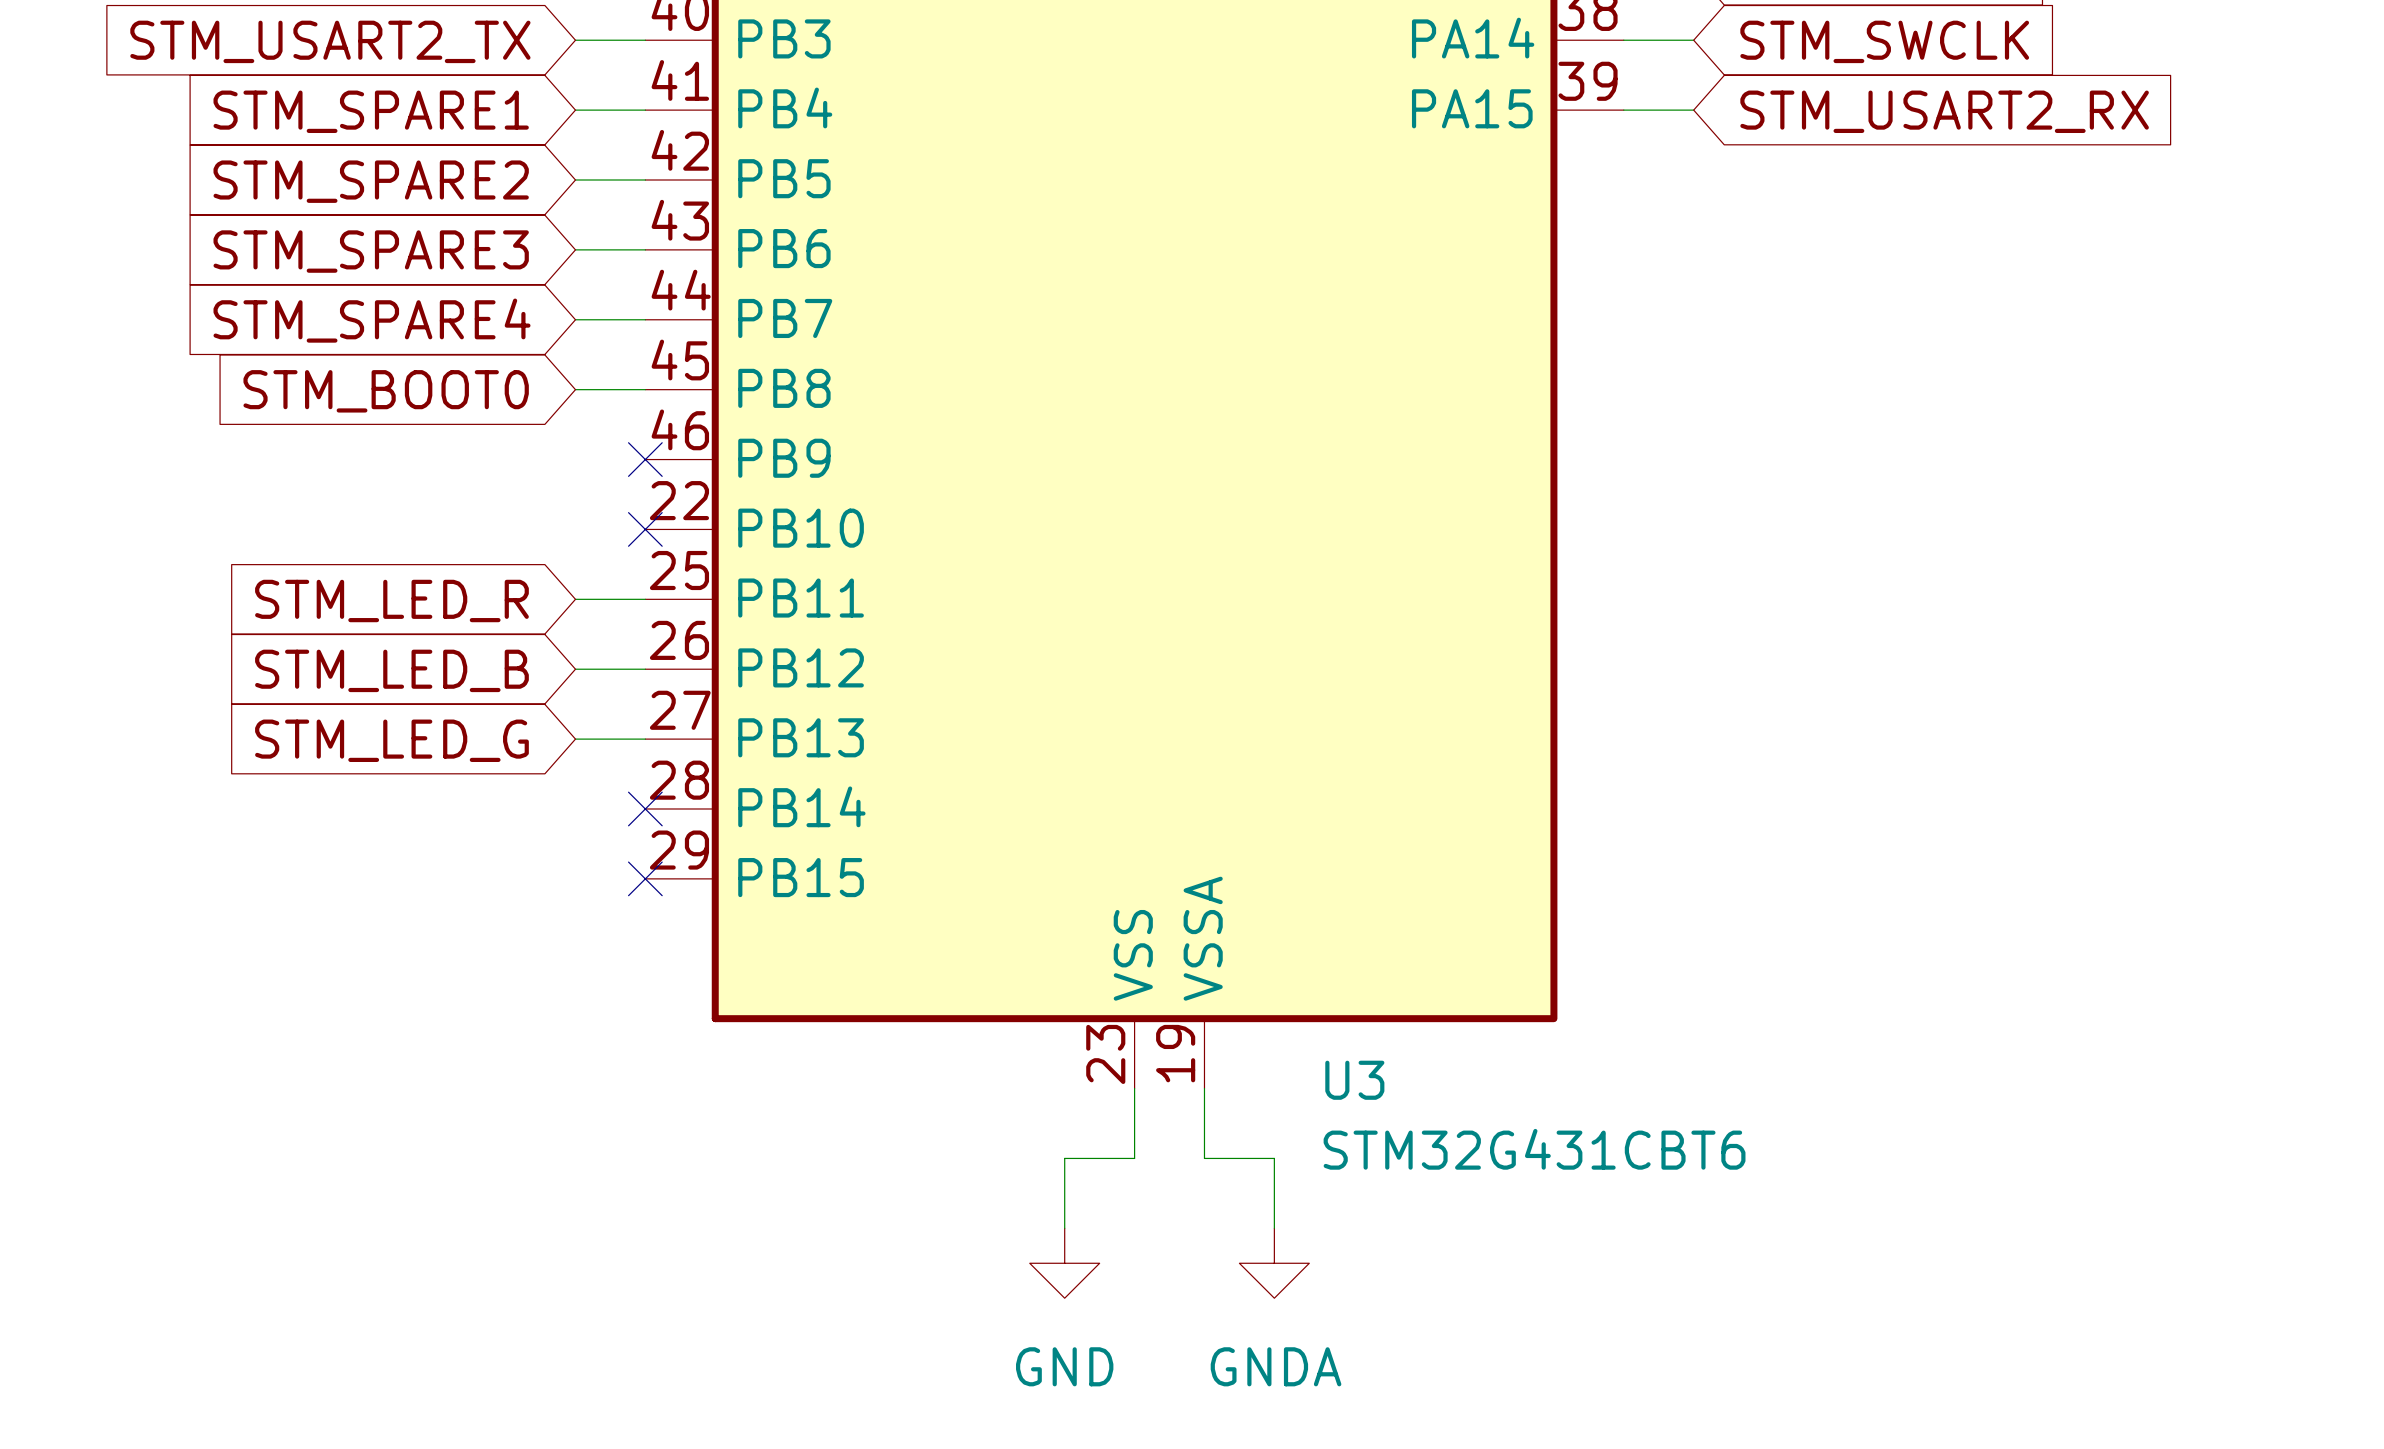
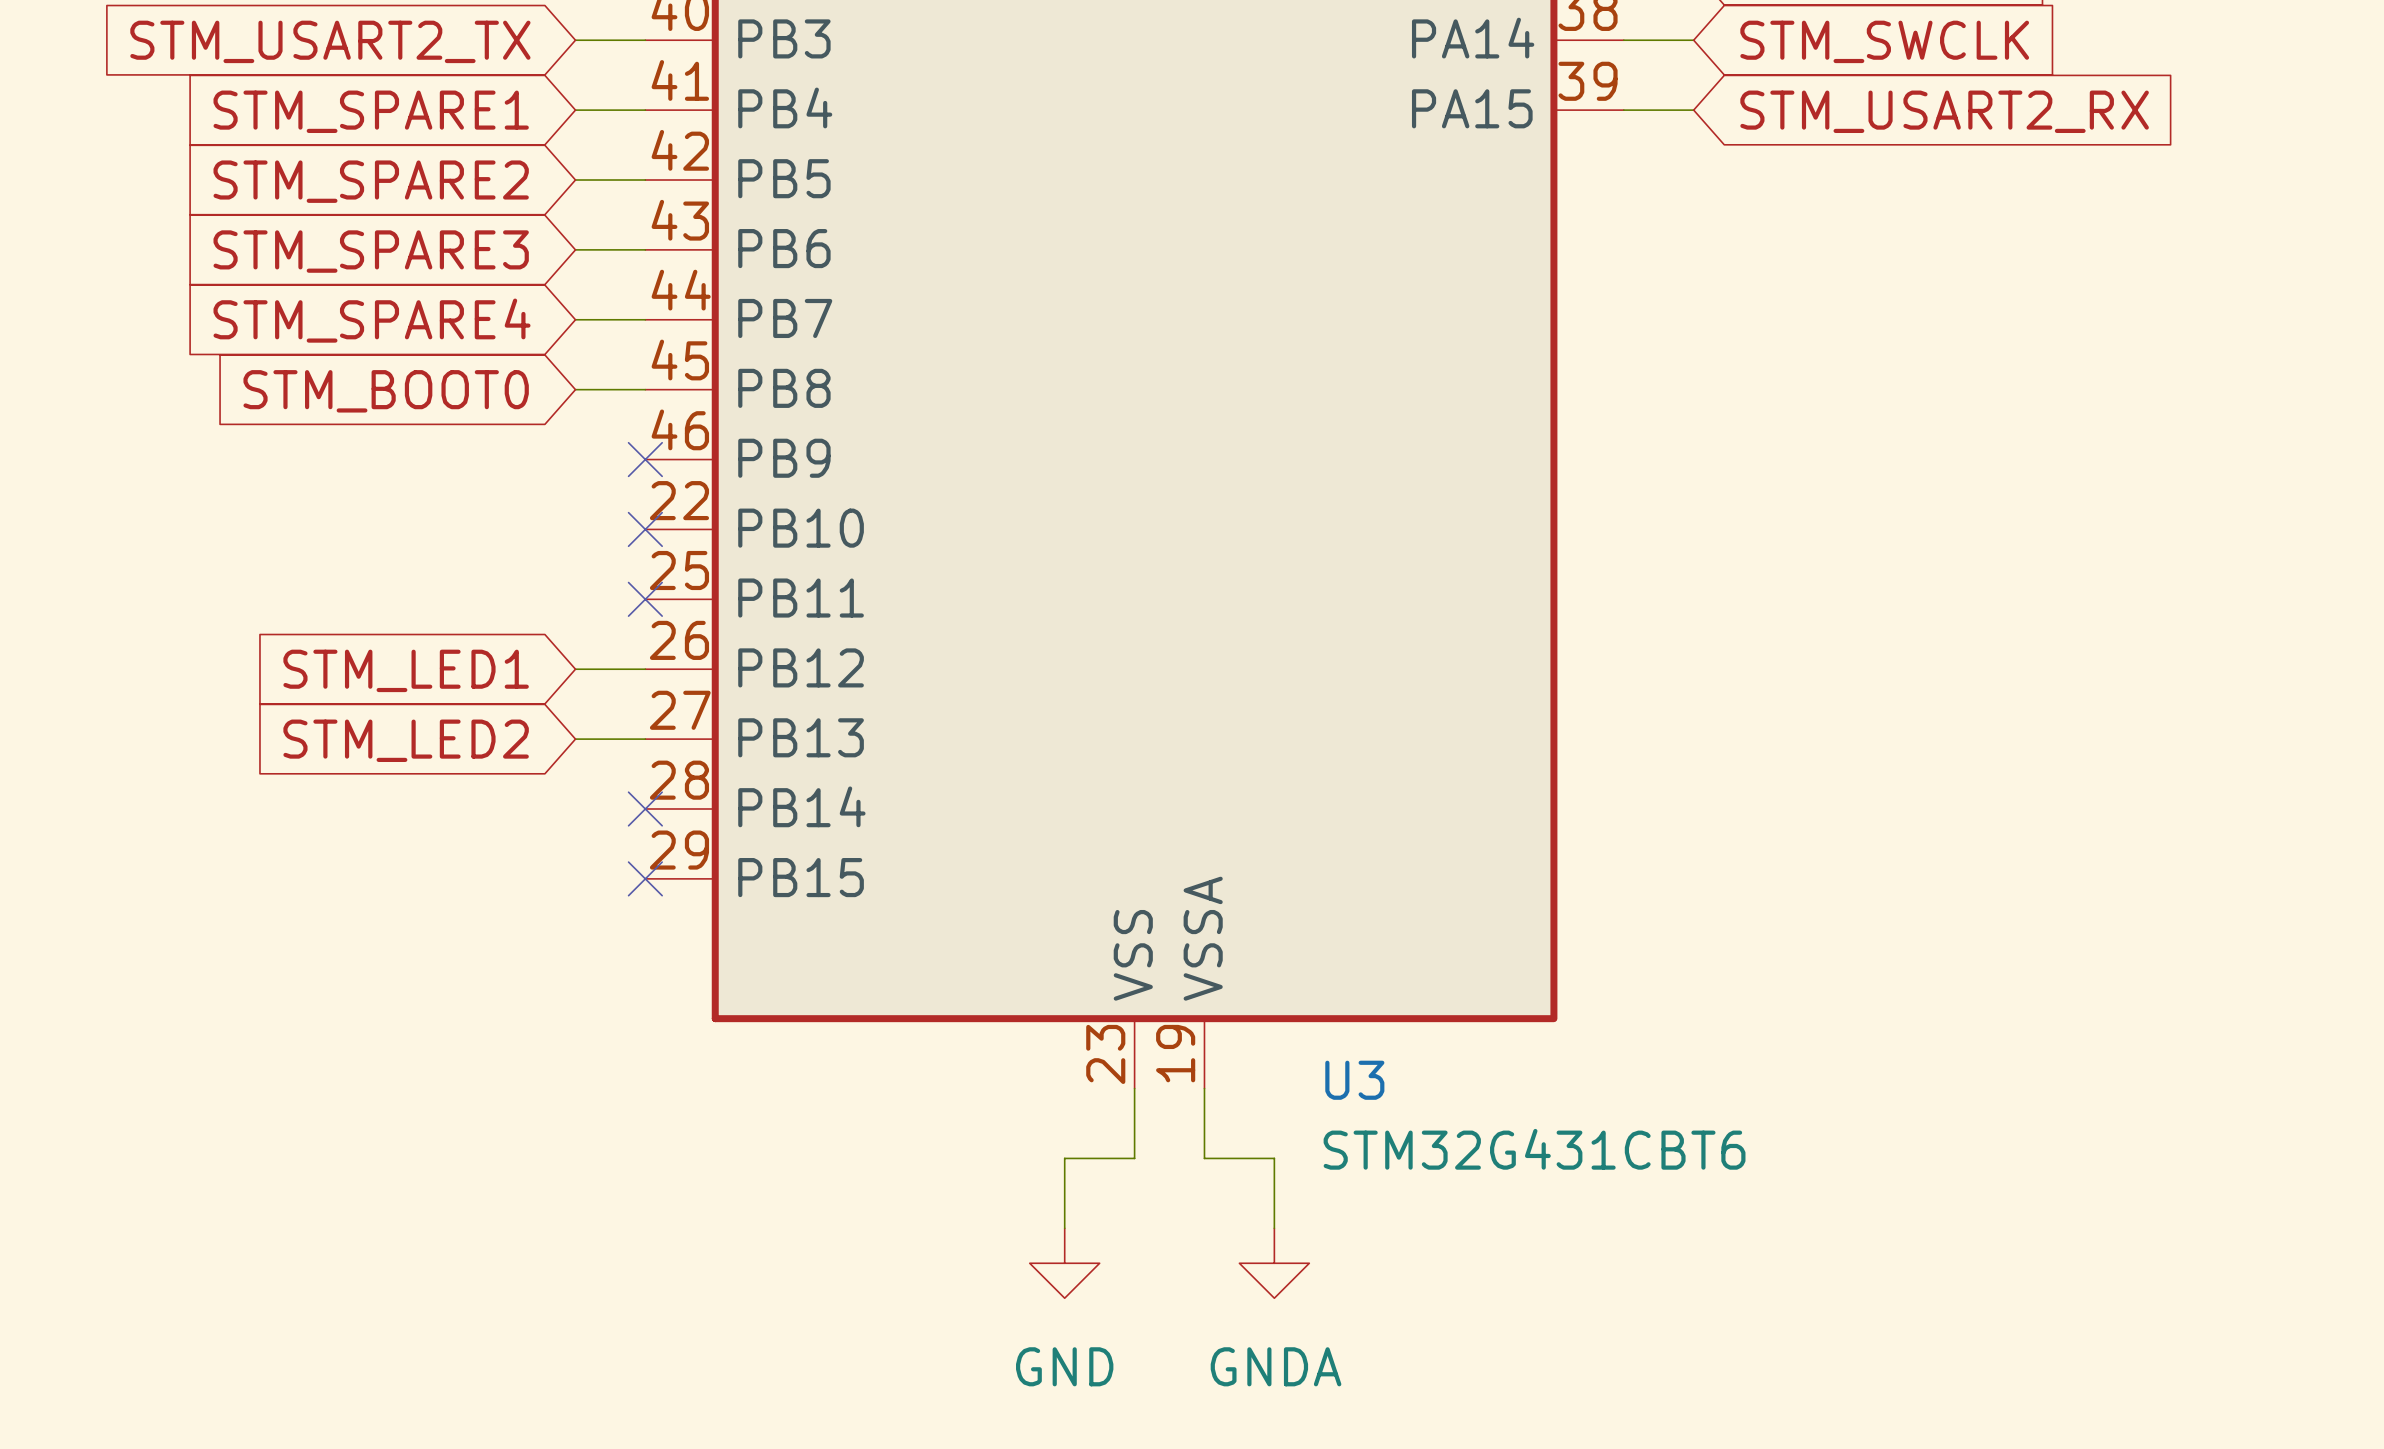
wire: (575, 599) (645, 599) -> none
no-connect mark: none -> (645, 599)
global label: STM_LED_R (391, 600) -> none
global label: STM_LED_B (391, 670) -> STM_LED1 (406, 670)
global label: STM_LED_G (391, 740) -> STM_LED2 (406, 740)

